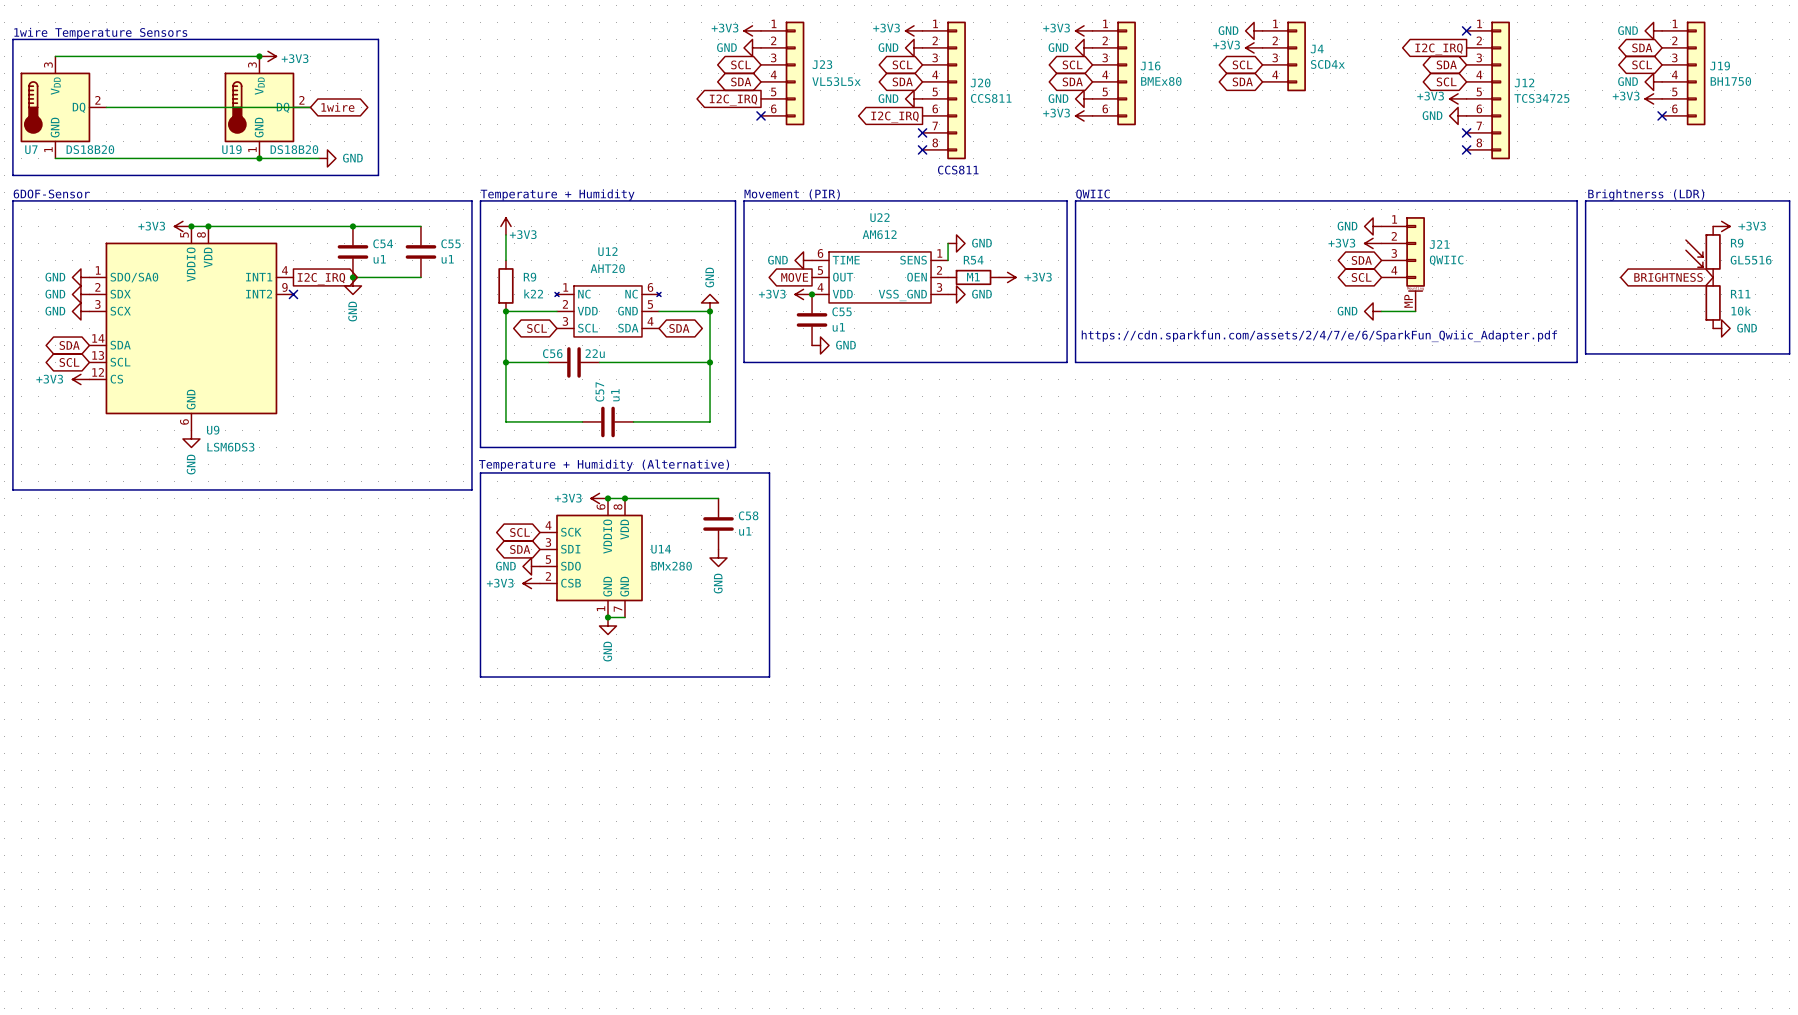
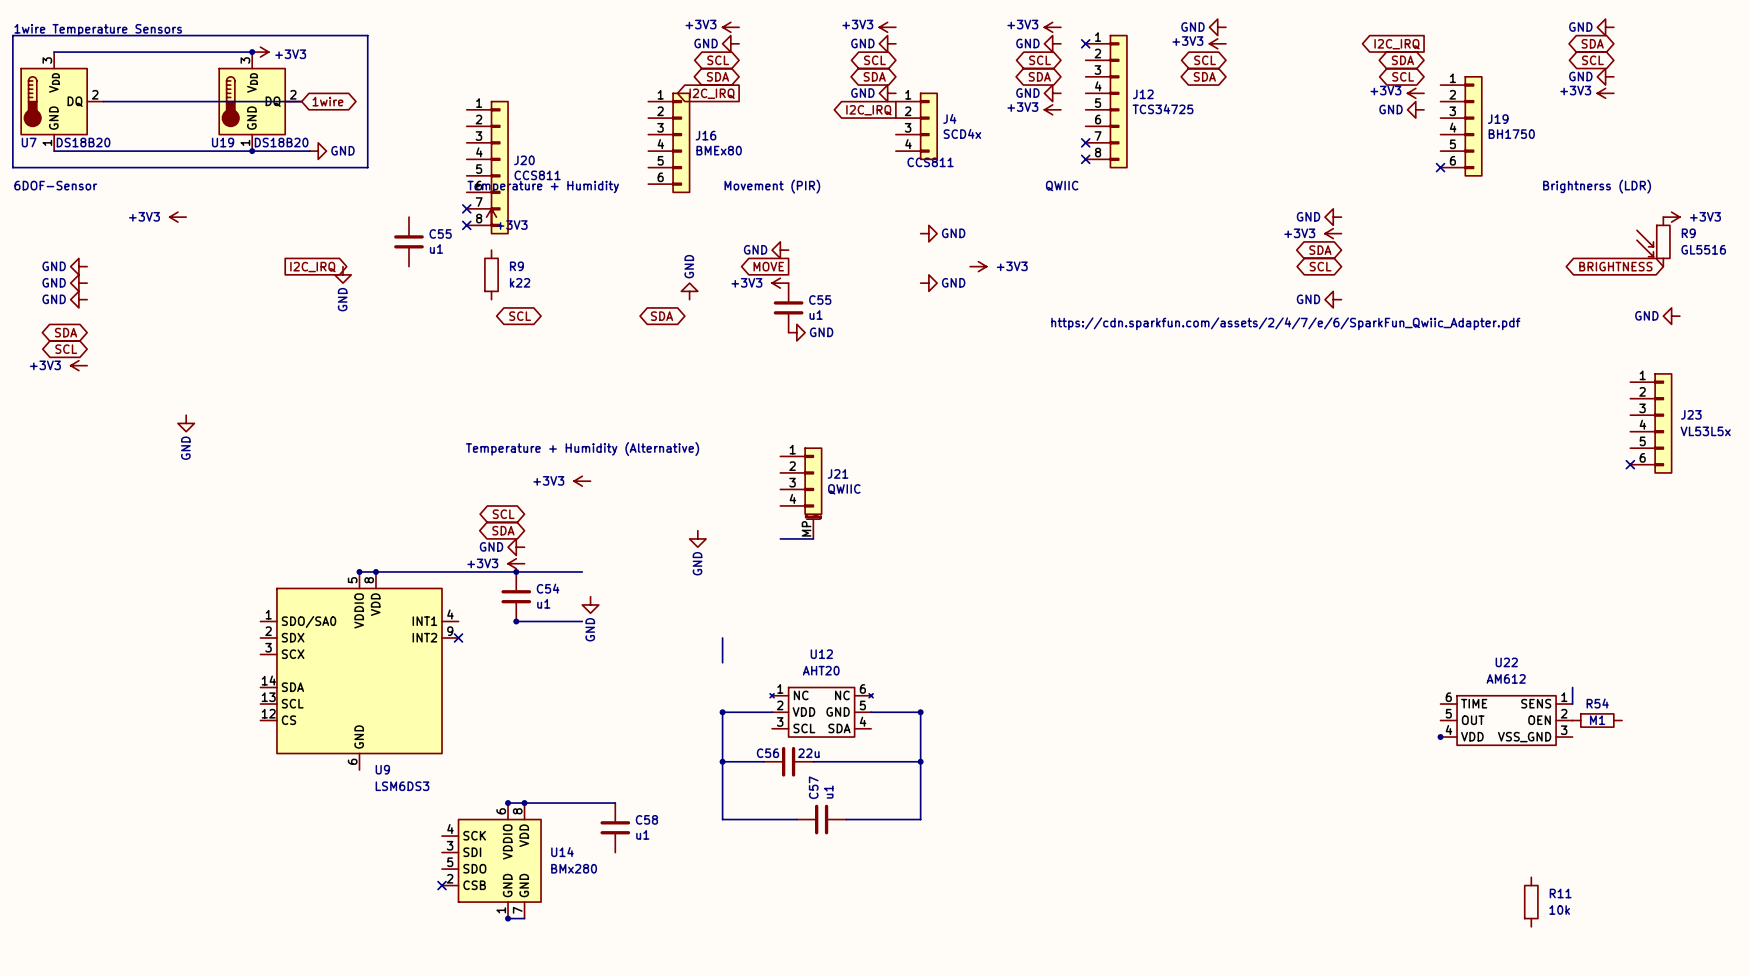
no-connect mark: (1466, 30) -> none
no-connect mark: none -> (1085, 43)
J4 position: (1284, 56) -> (916, 126)
J23 position: (782, 73) -> (1651, 423)
J16 position: (1114, 73) -> (669, 142)
J19 position: (1683, 73) -> (1461, 126)
J20 position: (944, 90) -> (487, 167)
J12 position: (1488, 90) -> (1106, 101)
no-connect mark: (761, 115) -> none
no-connect mark: (1662, 115) -> none
no-connect mark: (922, 132) -> none
no-connect mark: (1466, 132) -> none
no-connect mark: (922, 149) -> none
no-connect mark: none -> (1085, 142)
no-connect mark: (1466, 149) -> none
no-connect mark: none -> (1085, 159)
no-connect mark: none -> (1440, 167)
line: (12, 200) (471, 200) (471, 489) (12, 489) (12, 200) -> none
line: (480, 200) (735, 200) (735, 447) (480, 447) (480, 200) -> none
line: (744, 200) (1067, 200) (1067, 362) (744, 362) (744, 200) -> none
line: (1075, 200) (1577, 200) (1577, 362) (1075, 362) (1075, 200) -> none
line: (1585, 200) (1789, 200) (1789, 353) (1585, 353) (1585, 200) -> none
no-connect mark: none -> (466, 208)
wire: (191, 226) (420, 226) -> none
junction: (191, 226) -> none
junction: (208, 226) -> none
junction: (352, 226) -> none
no-connect mark: none -> (466, 225)
wire: (505, 234) (505, 260) -> none
wire: (948, 243) (948, 260) -> none
C54 position: (352, 251) -> (516, 596)
J21 position: (1403, 264) -> (801, 493)
wire: (352, 277) (420, 277) -> none
junction: (352, 277) -> none
U22 position: (880, 277) -> (1506, 720)
R54 position: (973, 277) -> (1597, 720)
no-connect mark: (293, 294) -> none
junction: (812, 294) -> none
R11 position: (1713, 302) -> (1531, 902)
junction: (505, 311) -> none
wire: (556, 311) (505, 311) (505, 421) (582, 421) -> none
U12 position: (608, 311) -> (821, 712)
wire: (659, 311) (710, 311) (710, 421) (633, 421) -> none
junction: (710, 311) -> none
wire: (1381, 311) (1415, 311) -> none
U9 position: (191, 328) -> (359, 671)
power symbol rotation: 0° (1721, 328) -> 180° (1671, 316)
wire: (505, 362) (548, 362) -> none
junction: (505, 362) -> none
C56 position: (573, 362) -> (788, 761)
wire: (599, 362) (710, 362) -> none
junction: (710, 362) -> none
C57 position: (608, 421) -> (821, 819)
line: (480, 472) (769, 472) (769, 677) (480, 677) (480, 472) -> none
no-connect mark: none -> (1630, 464)
wire: (608, 498) (718, 498) -> none
junction: (608, 498) -> none
junction: (625, 498) -> none
C58 position: (718, 523) -> (615, 827)
U14 position: (591, 557) -> (491, 860)
wire: none -> (780, 538) (813, 538)
wire: none -> (359, 571) (582, 571)
junction: none -> (359, 571)
junction: none -> (375, 571)
junction: none -> (516, 571)
wire: (608, 617) (625, 617) -> none
junction: (608, 617) -> none
wire: none -> (516, 621) (582, 621)
junction: none -> (516, 621)
no-connect mark: none -> (458, 637)
wire: none -> (722, 637) (722, 662)
wire: none -> (1572, 687) (1572, 704)
junction: none -> (722, 712)
wire: none -> (772, 712) (722, 712) (722, 819) (796, 819)
wire: none -> (871, 712) (920, 712) (920, 819) (846, 819)
junction: none -> (920, 712)
junction: none -> (1440, 737)
wire: none -> (722, 761) (763, 761)
junction: none -> (722, 761)
wire: none -> (813, 761) (920, 761)
junction: none -> (920, 761)
wire: none -> (508, 803) (615, 803)
junction: none -> (508, 803)
junction: none -> (524, 803)
no-connect mark: none -> (442, 885)
wire: none -> (508, 918) (524, 918)
junction: none -> (508, 918)

